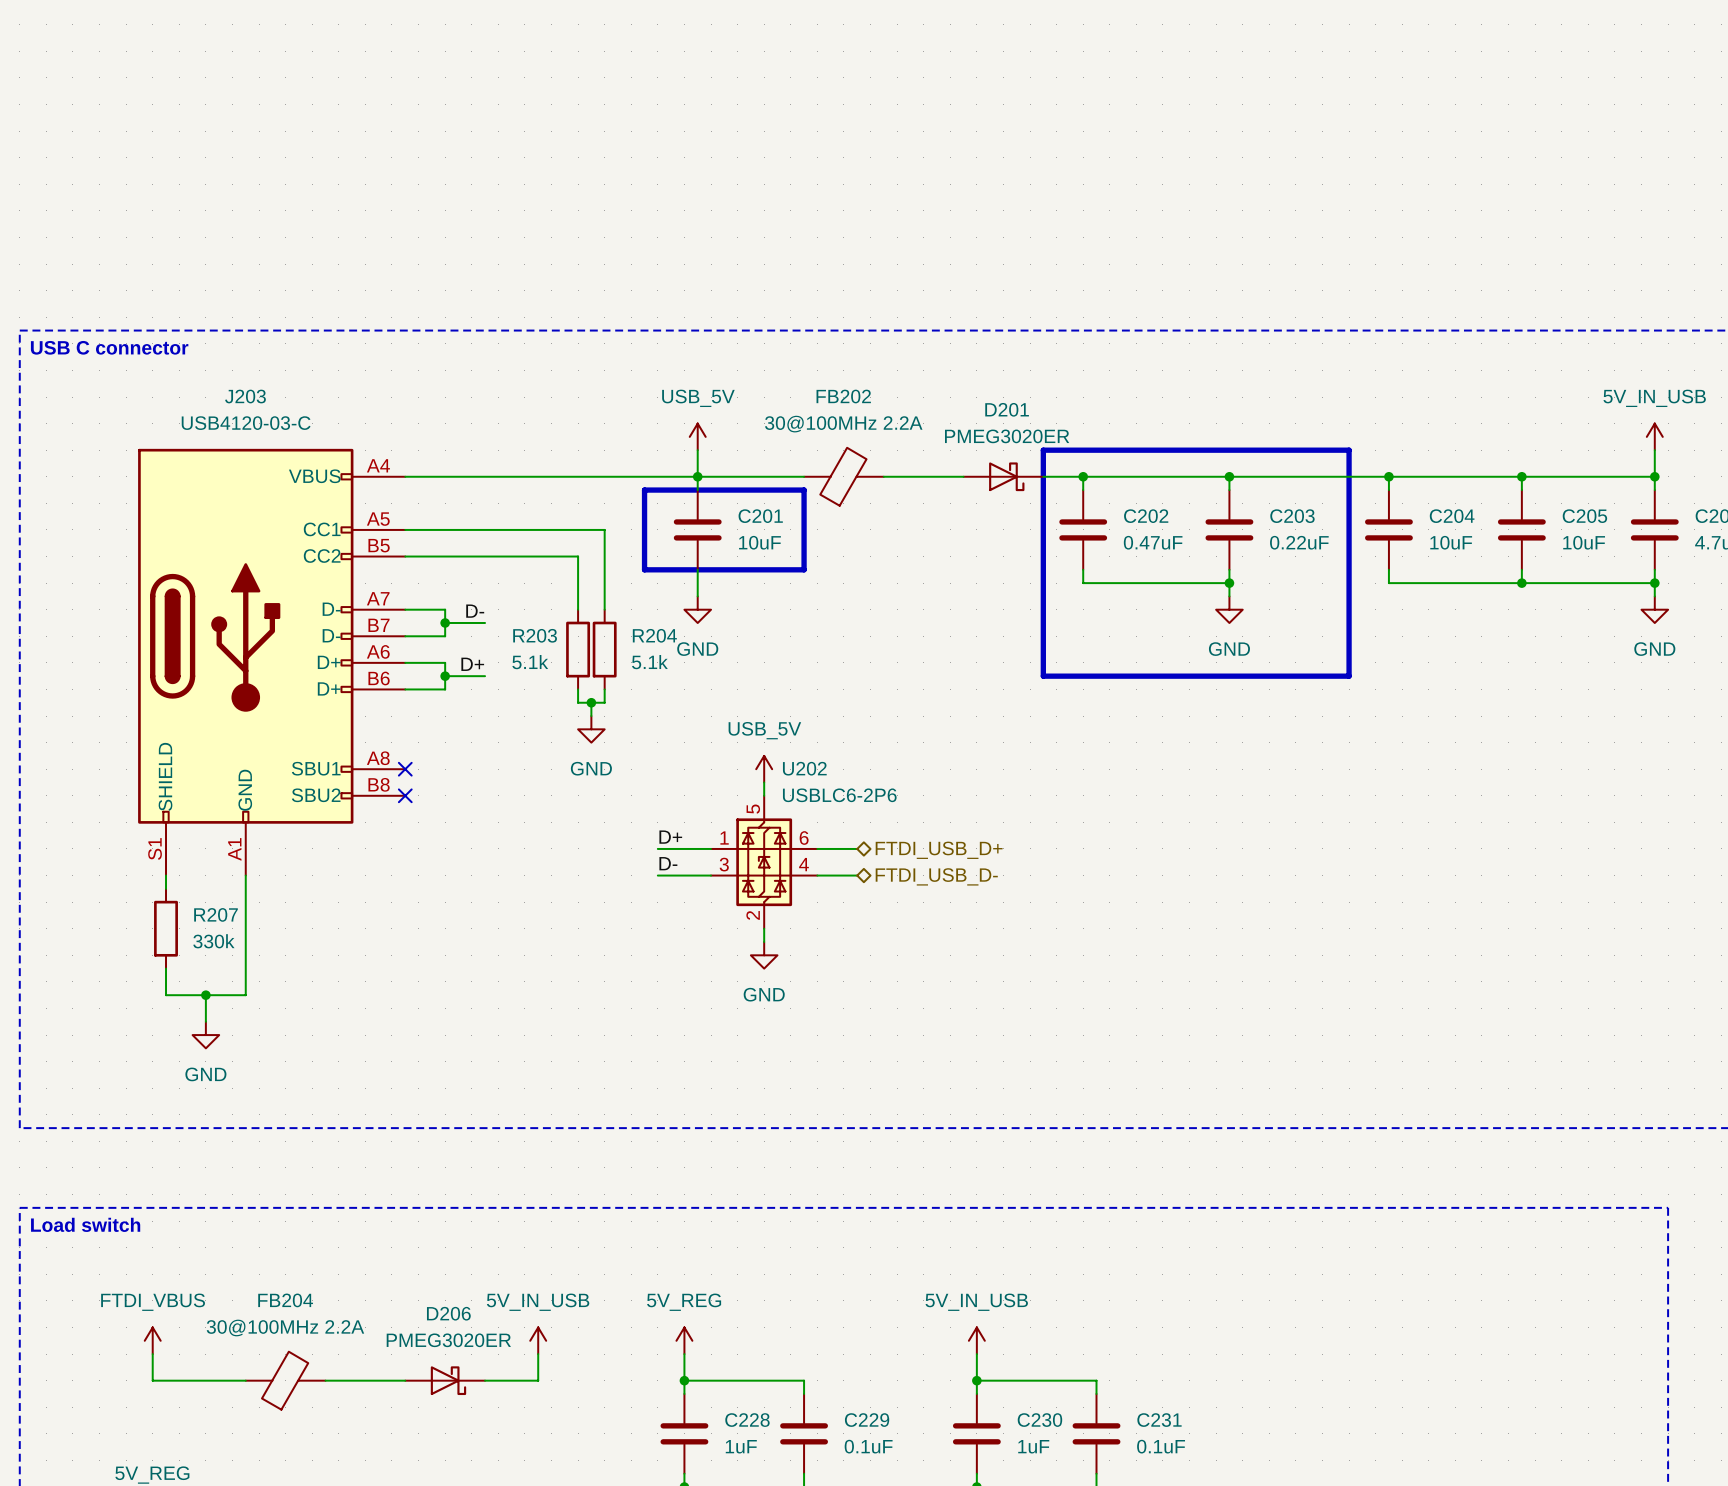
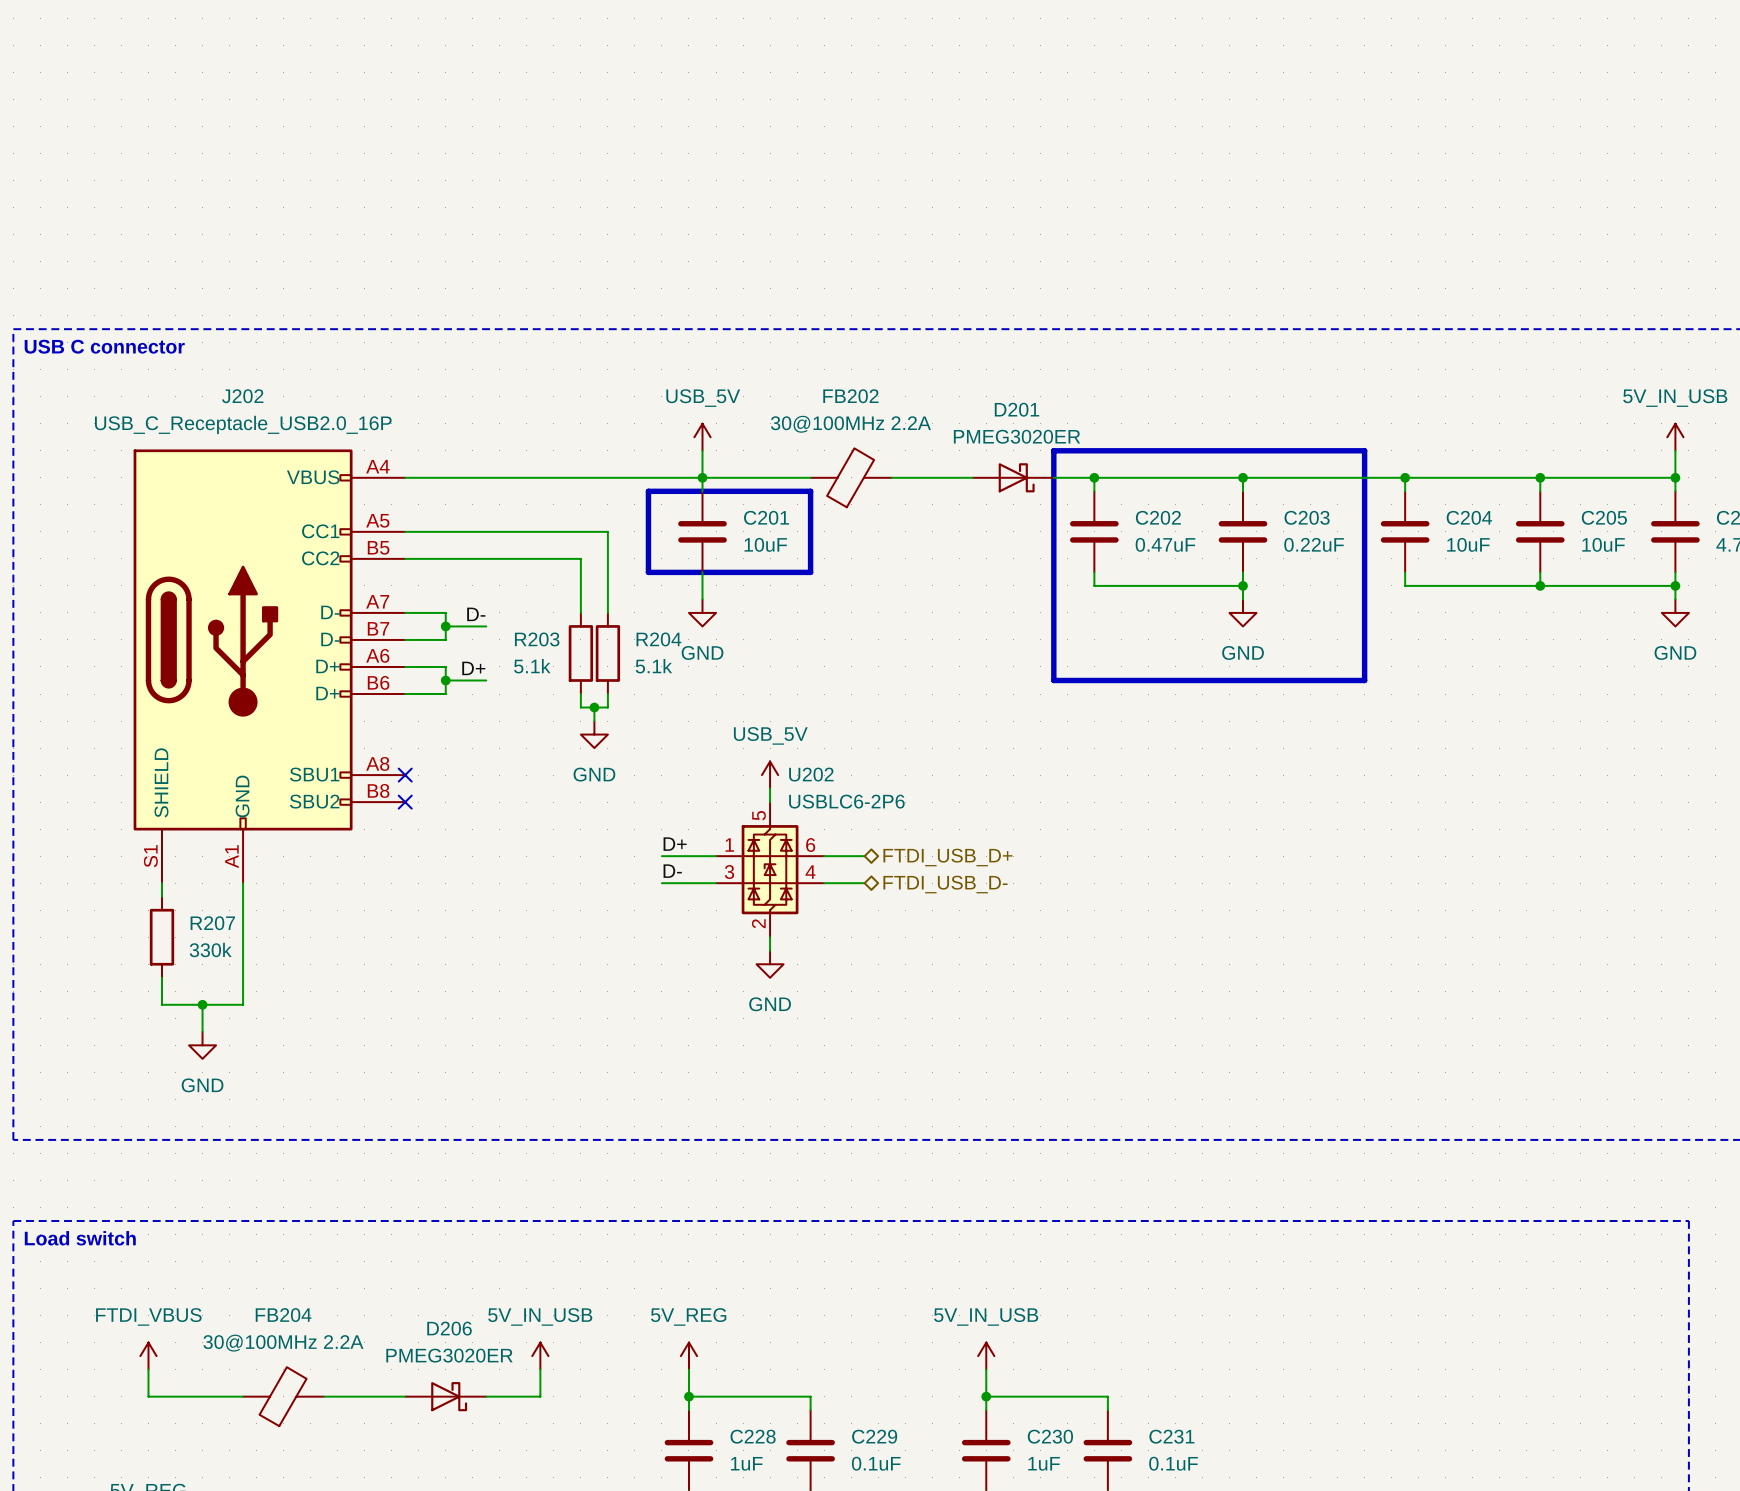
J203: USB4120-03-C (271, 662) -> none
J202: none -> USB_C_Receptacle_USB2.0_16P (269, 666)

